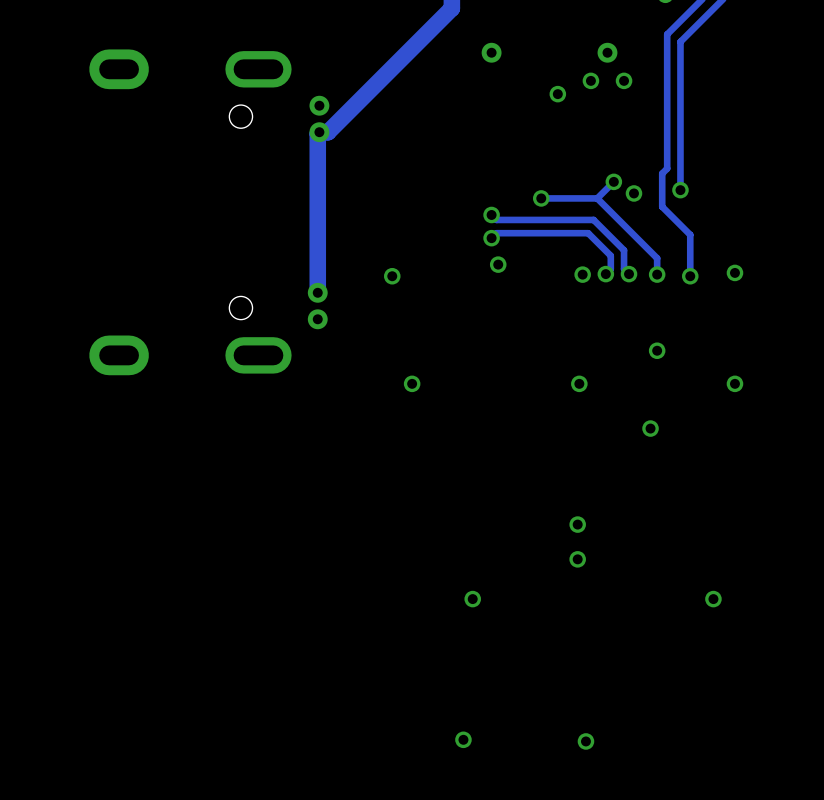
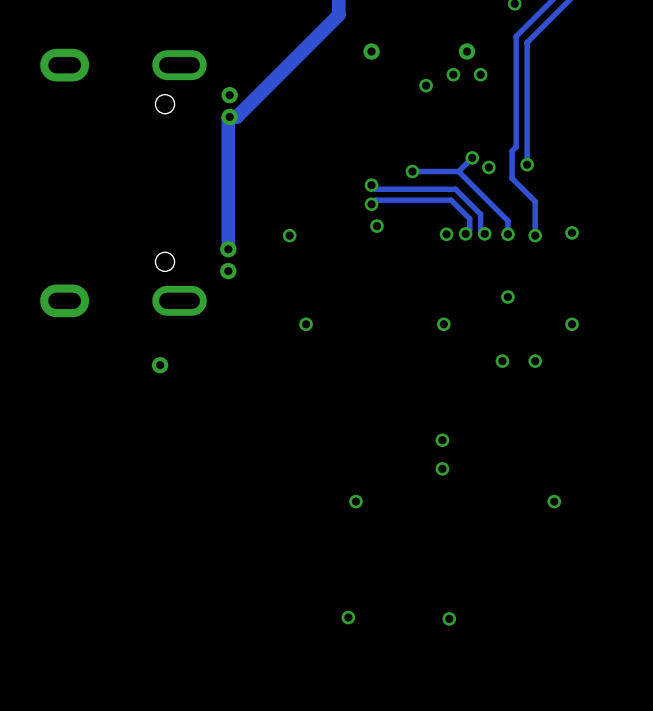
via: none -> (535, 361)
via: none -> (160, 365)

